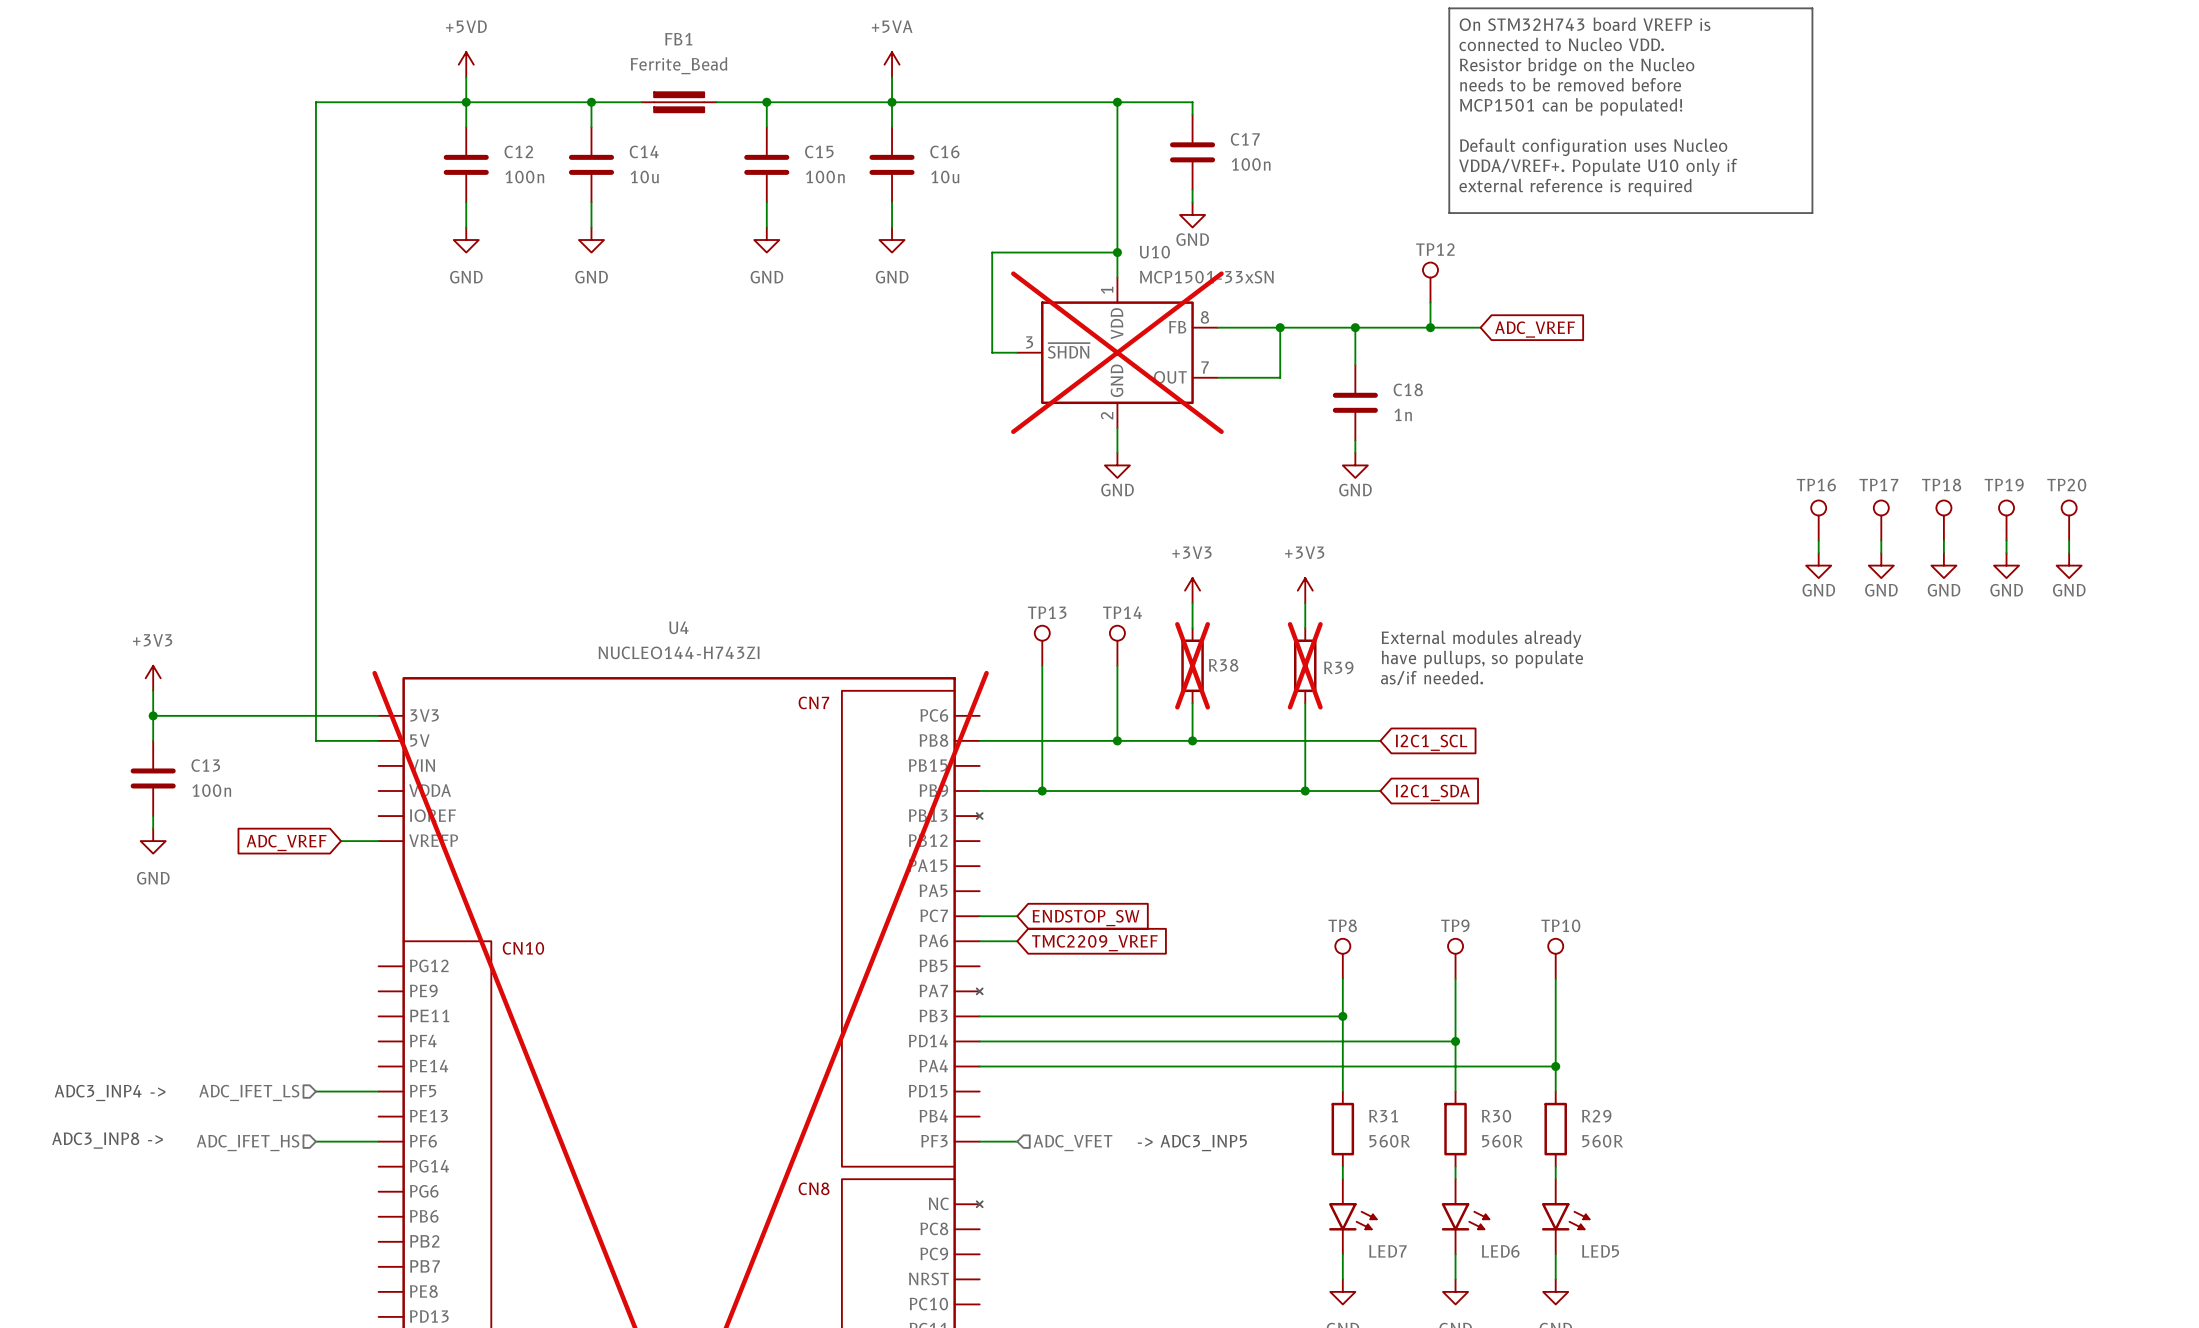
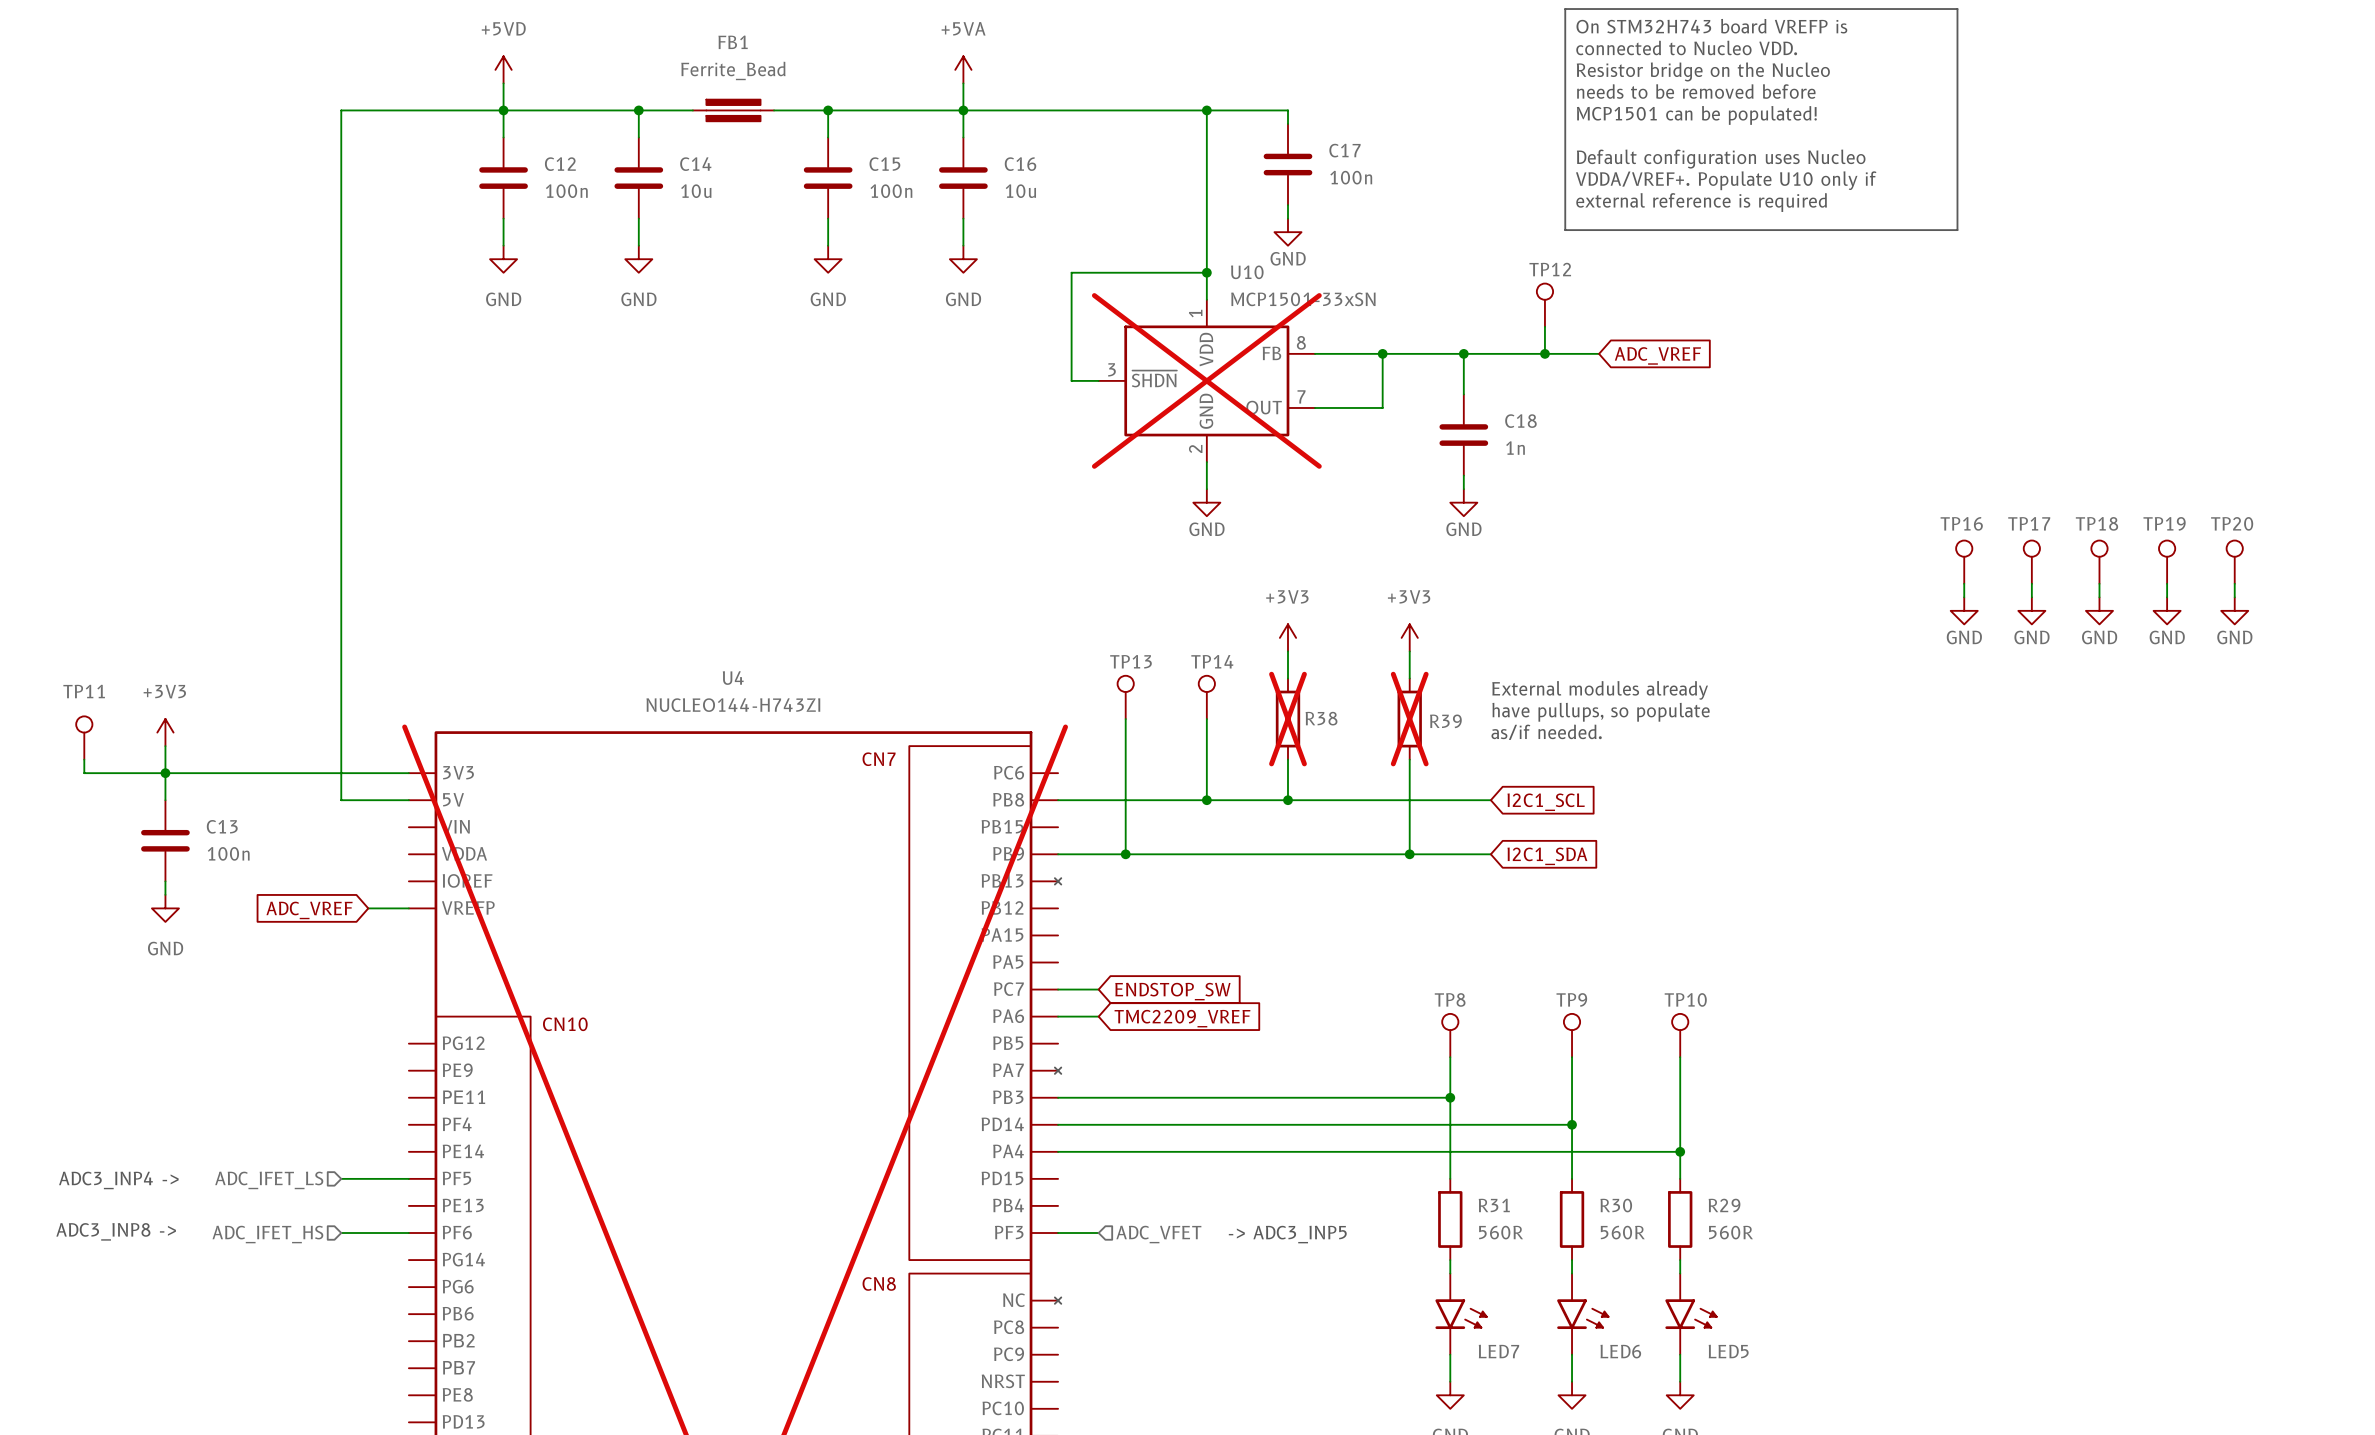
TP11: none -> (84, 737)
wire: none -> (84, 759) (84, 773) (165, 773)

